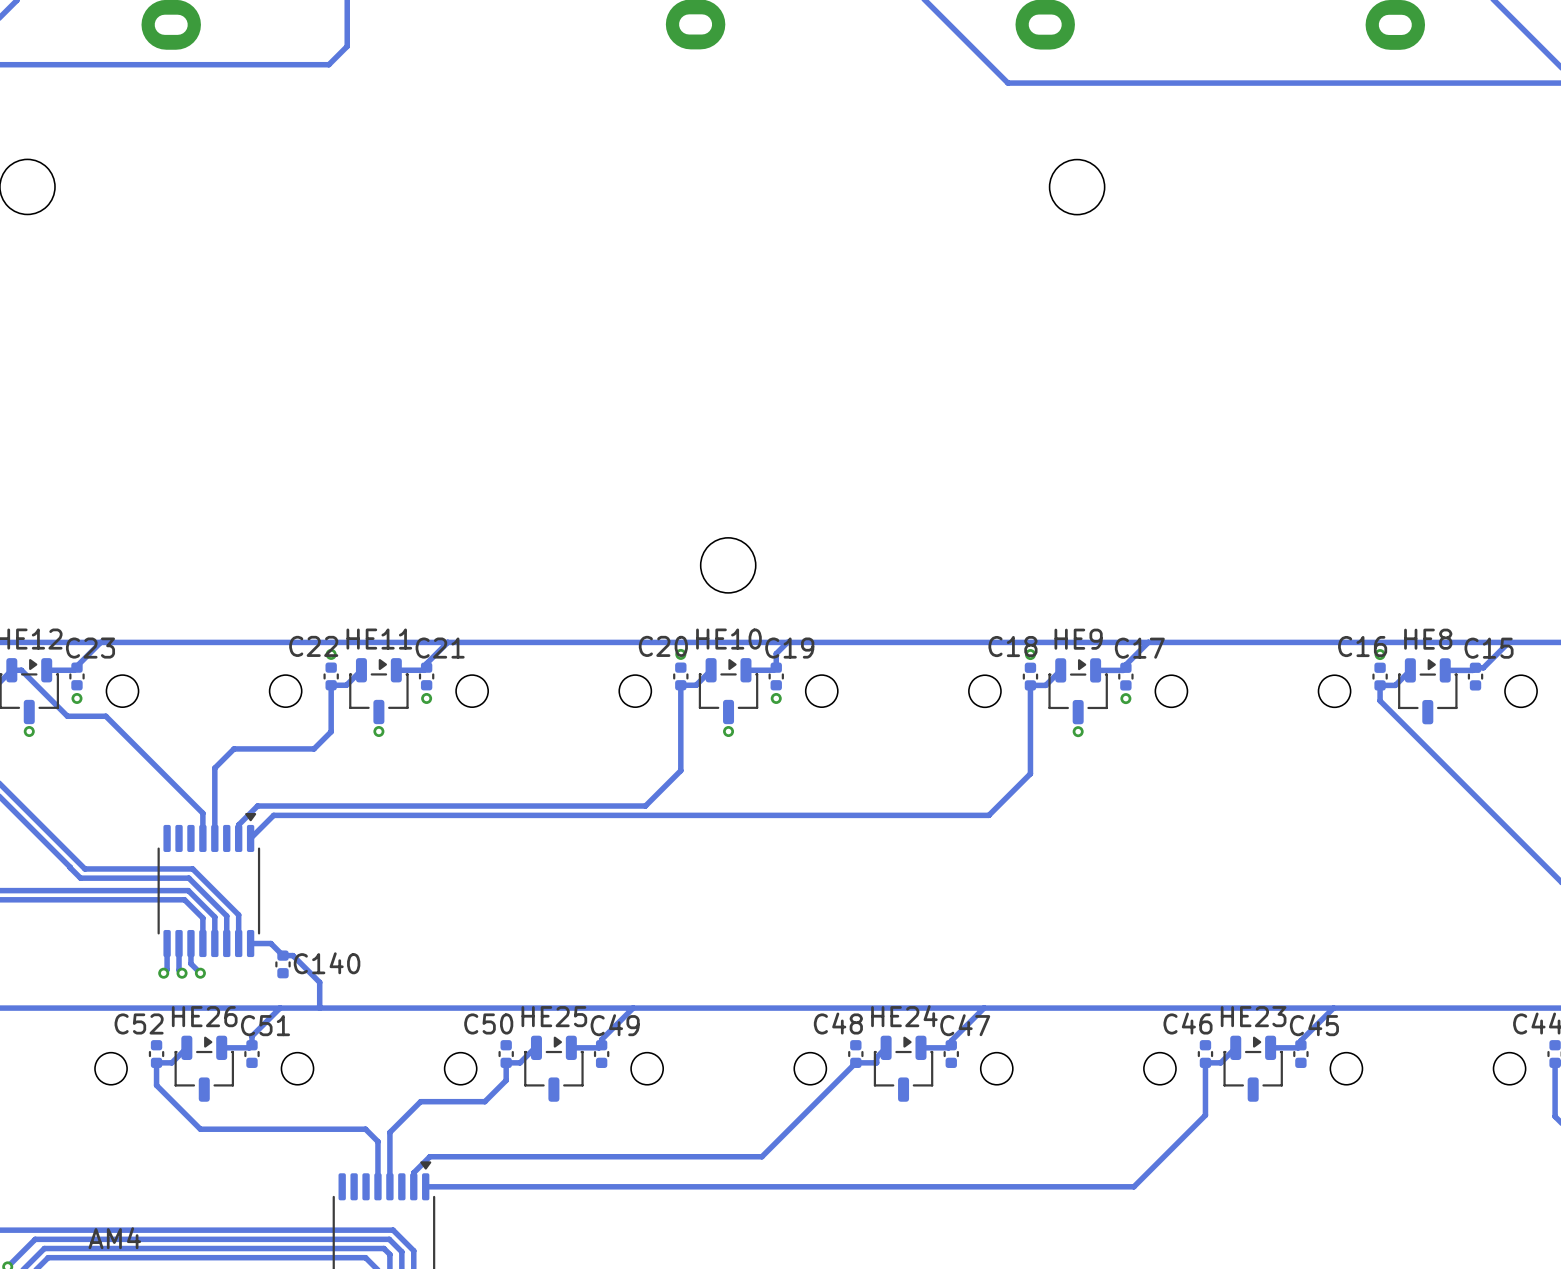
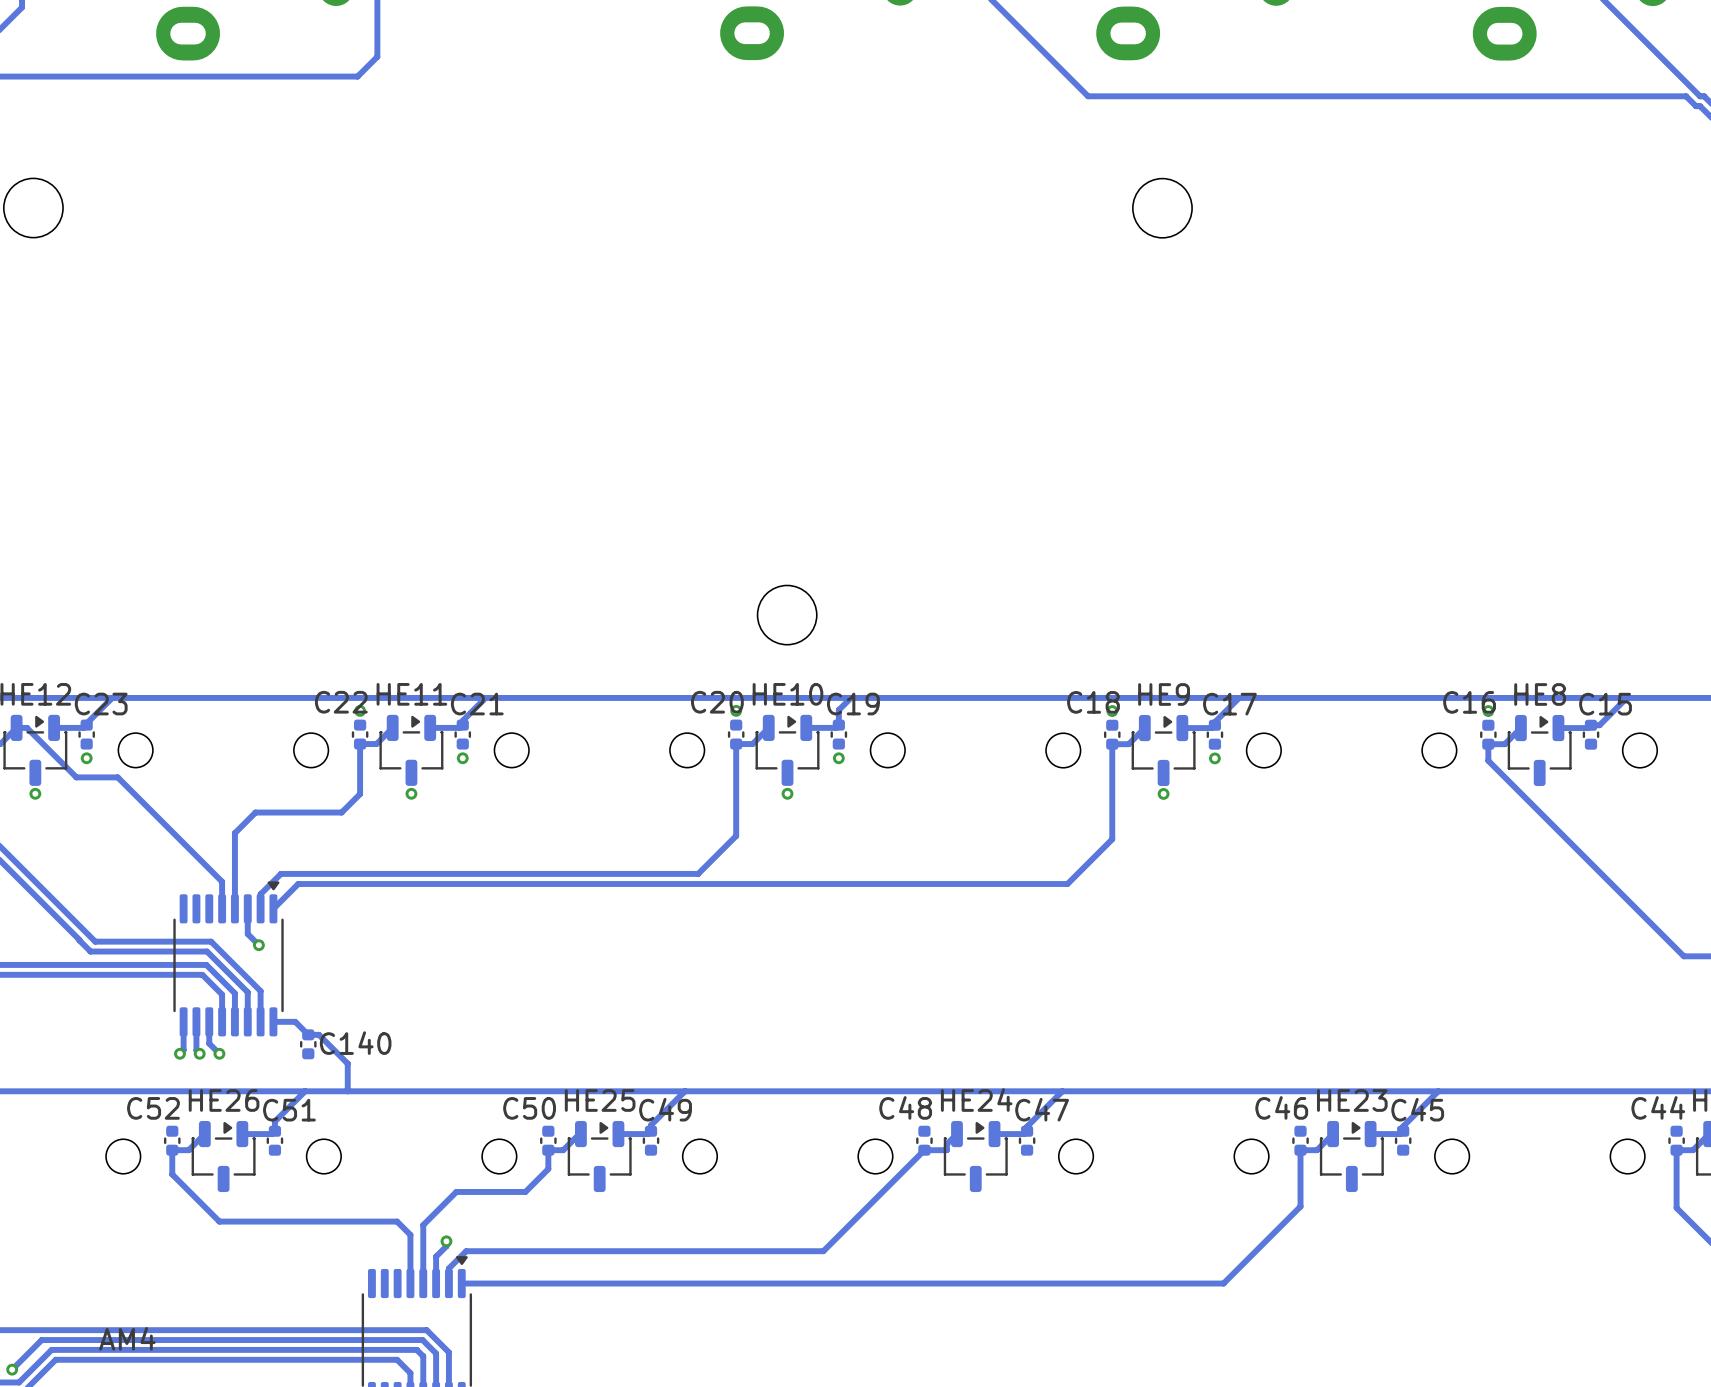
track: none -> (247, 908) (247, 934) (258, 945)
via: none -> (258, 945)
track: none -> (446, 1241) (446, 1246) (436, 1256) (436, 1283)
via: none -> (446, 1241)

